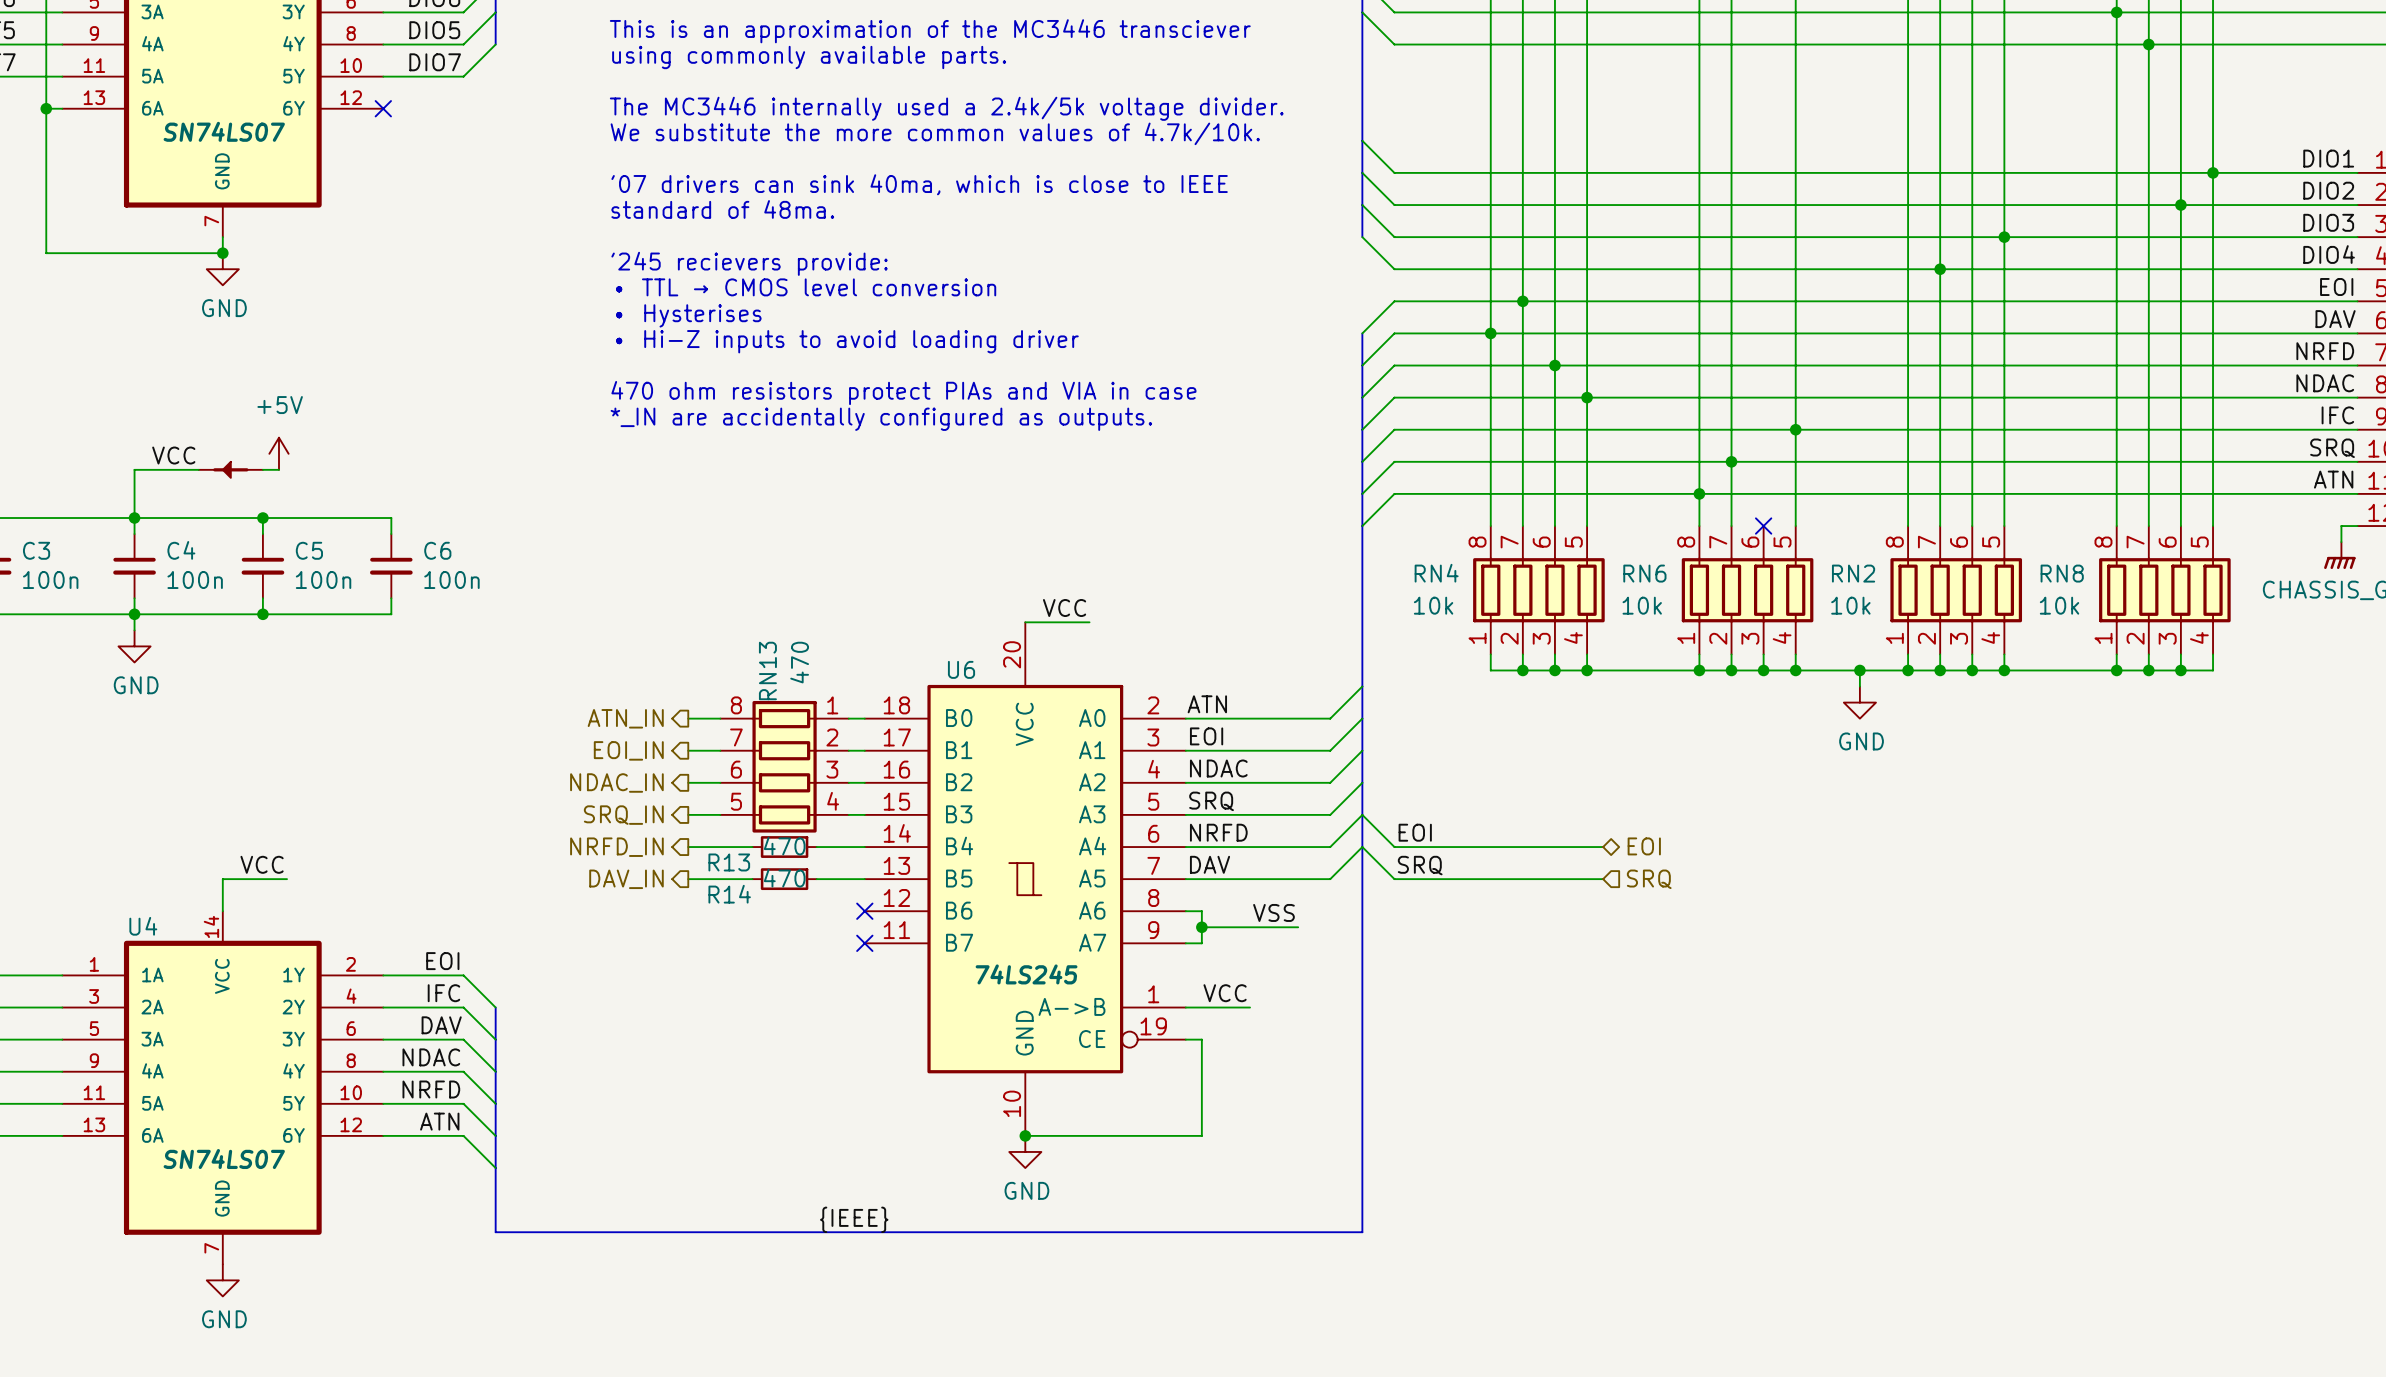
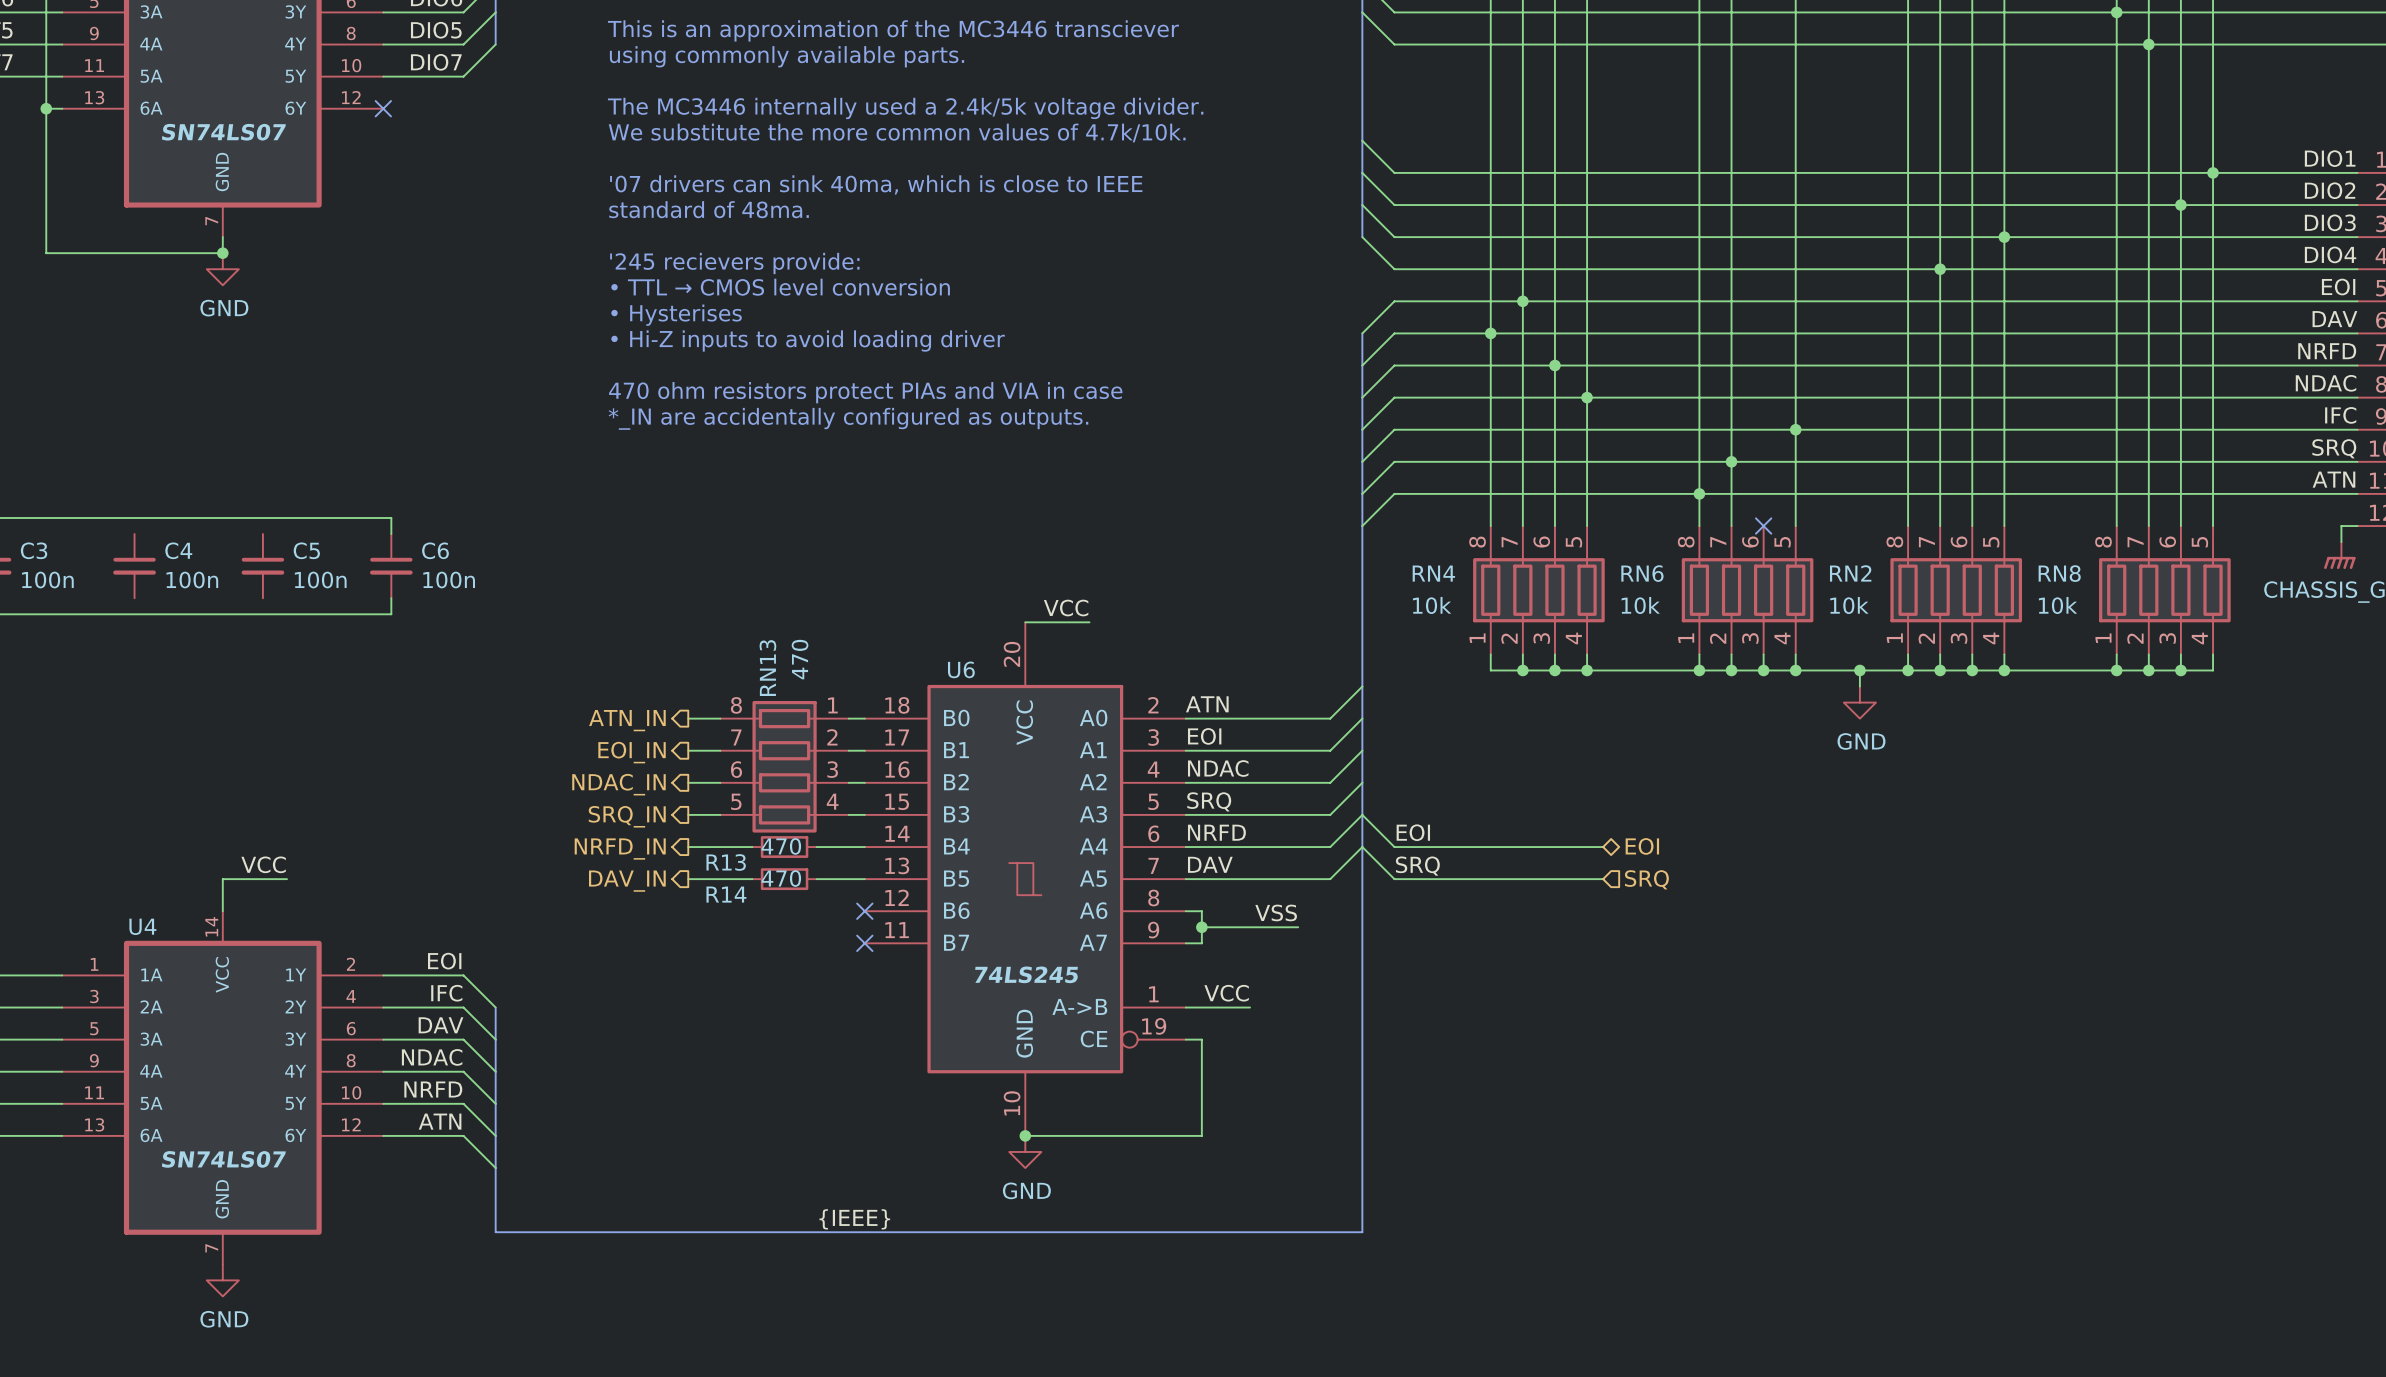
power symbol: +5V (278, 453) -> none
label: VCC (173, 455) -> none
wire: (198, 469) (134, 469) (134, 534) -> none
part: (230, 469) -> none
wire: (262, 469) (278, 469) -> none
junction: (134, 518) -> none
wire: (262, 518) (262, 534) -> none
junction: (262, 518) -> none
wire: (134, 598) (134, 630) -> none
wire: (262, 598) (262, 614) -> none
junction: (134, 614) -> none
junction: (262, 614) -> none
power symbol: GND (134, 646) -> none

